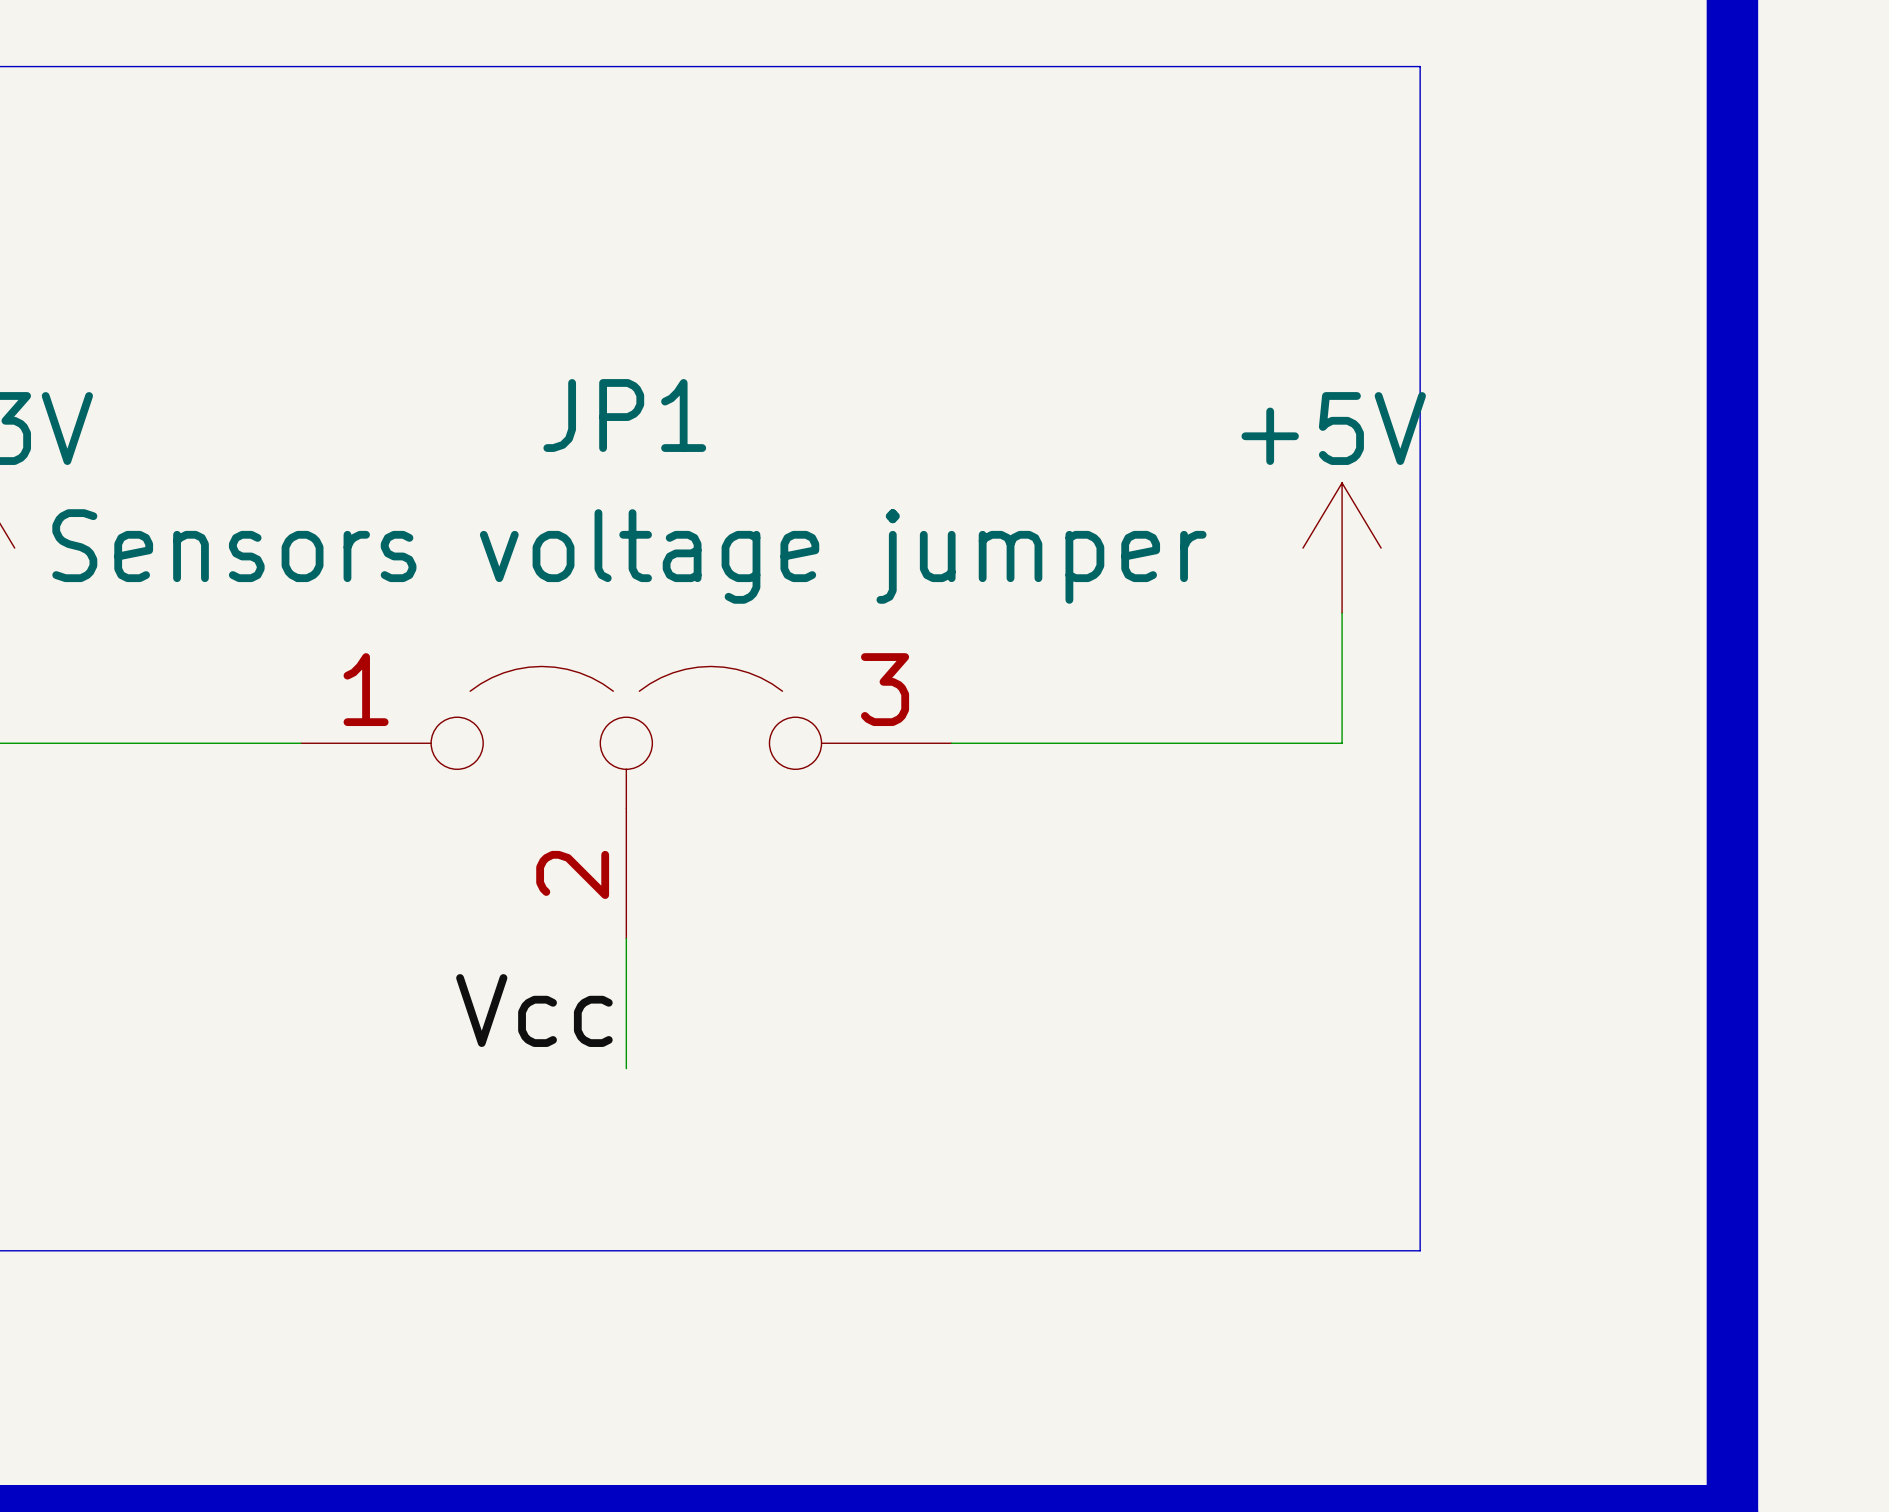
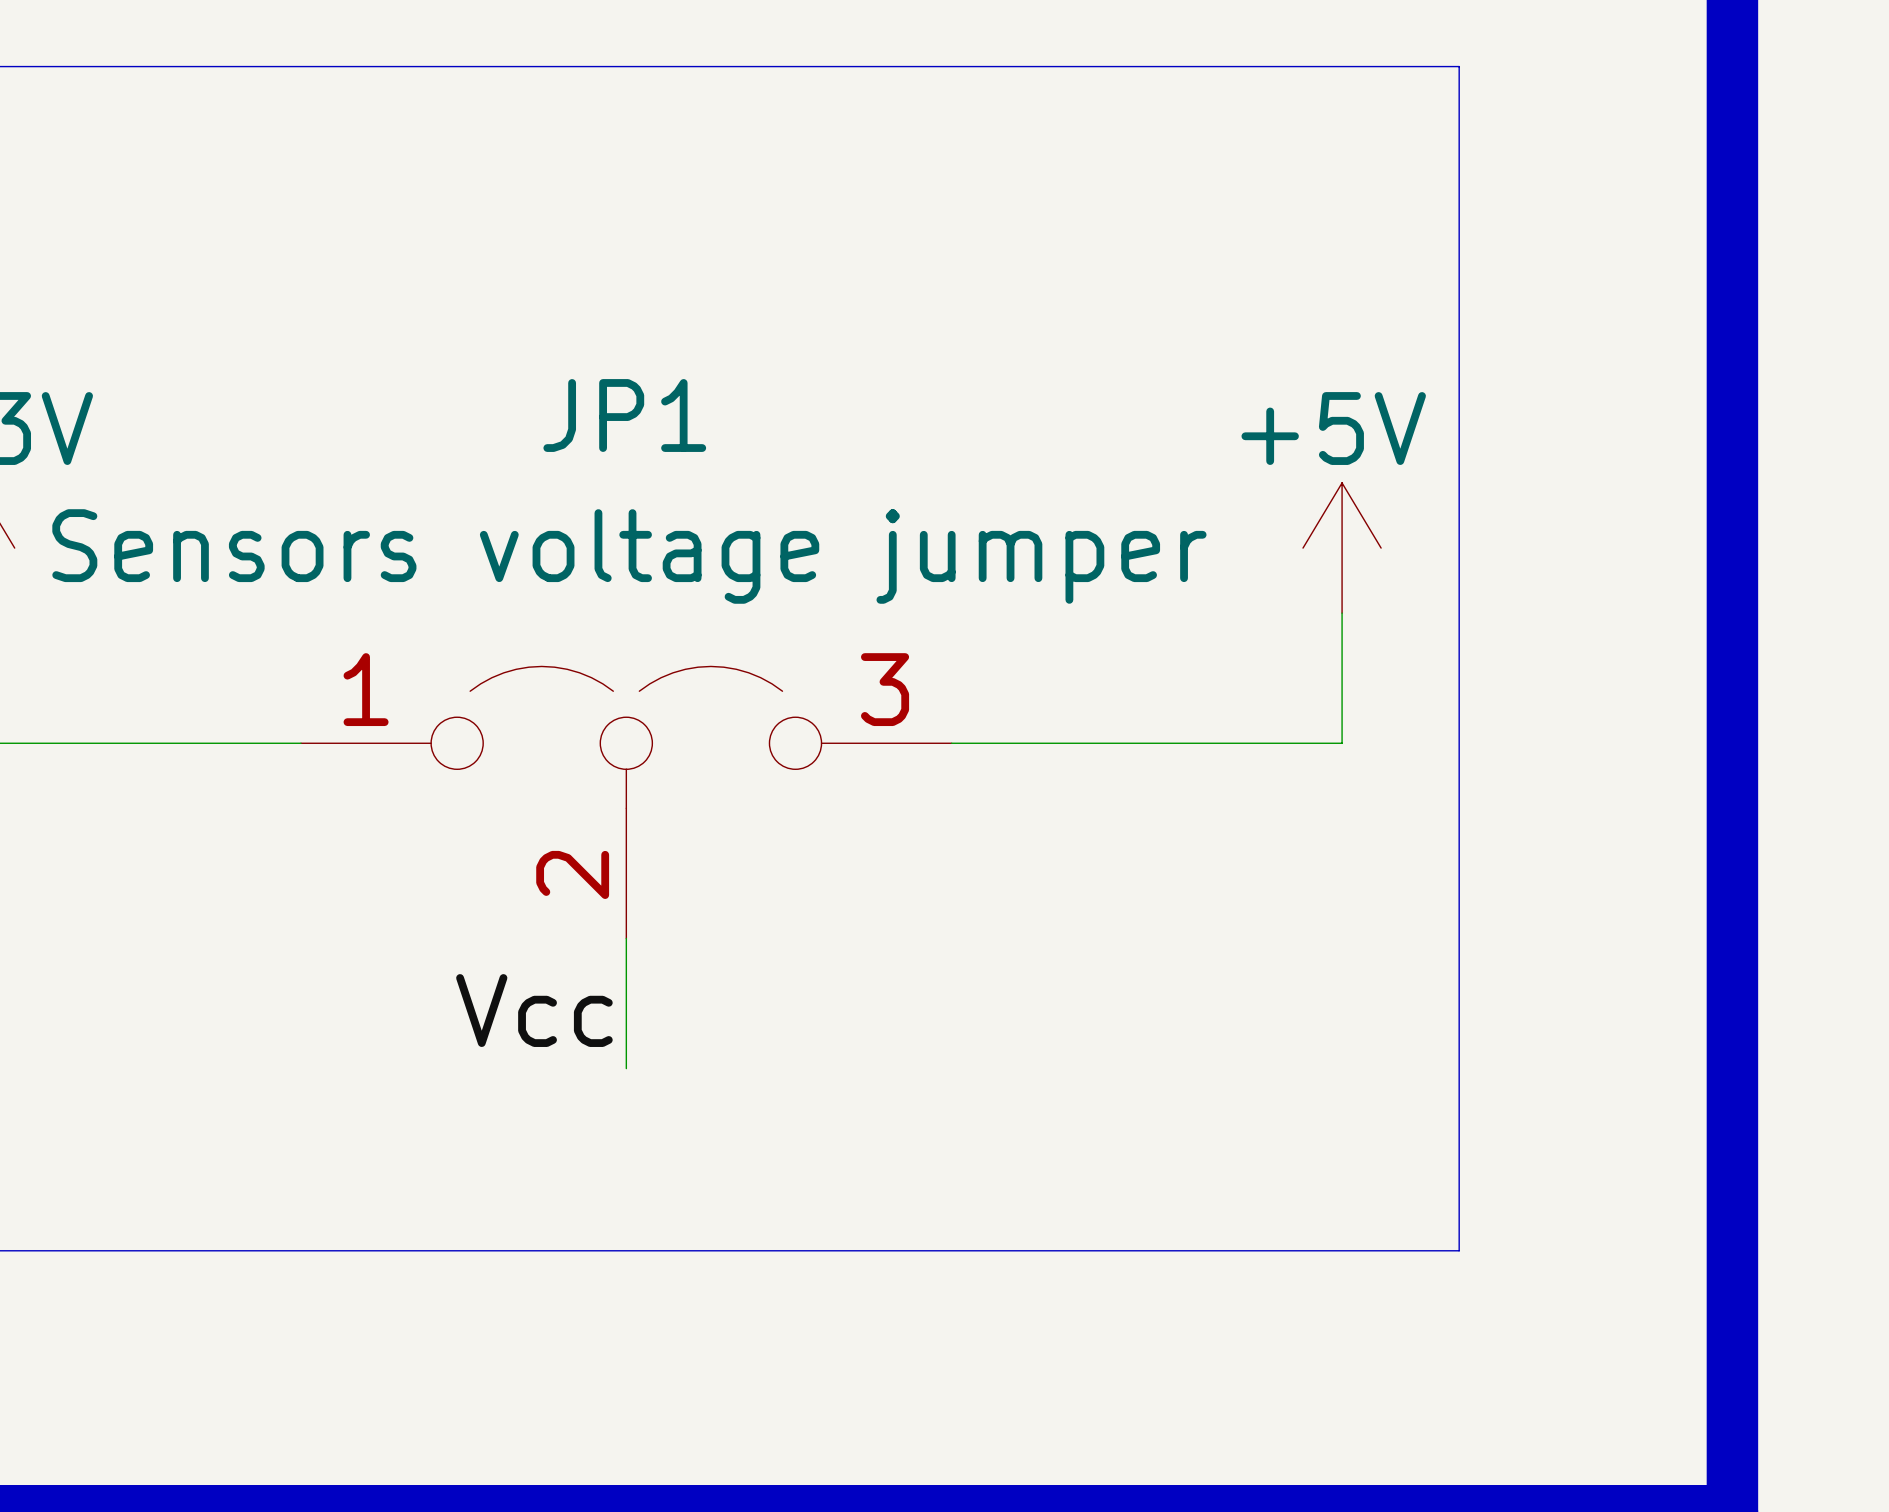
line: (1420, 66) (1420, 1250) -> (1420, 66) (1459, 66) (1459, 1250) (1420, 1250)

